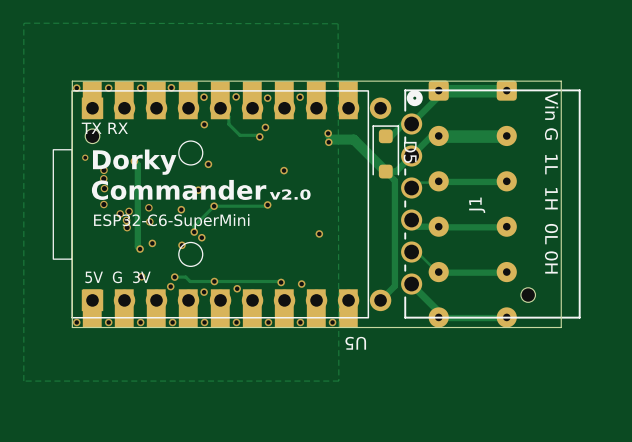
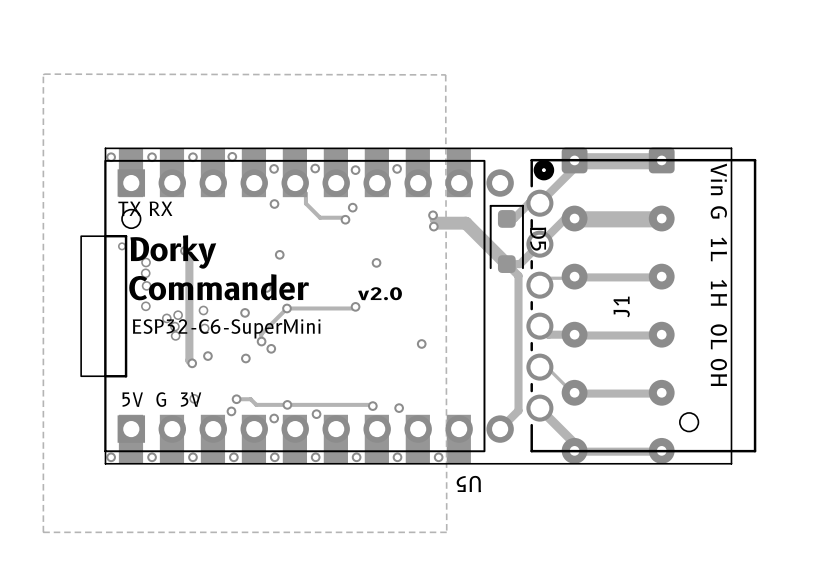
drawing: [178, 140, 204, 166] -> none
line: none -> (105, 236) (126, 236) (126, 376) (105, 376)
drawing: [178, 241, 204, 267] -> none

